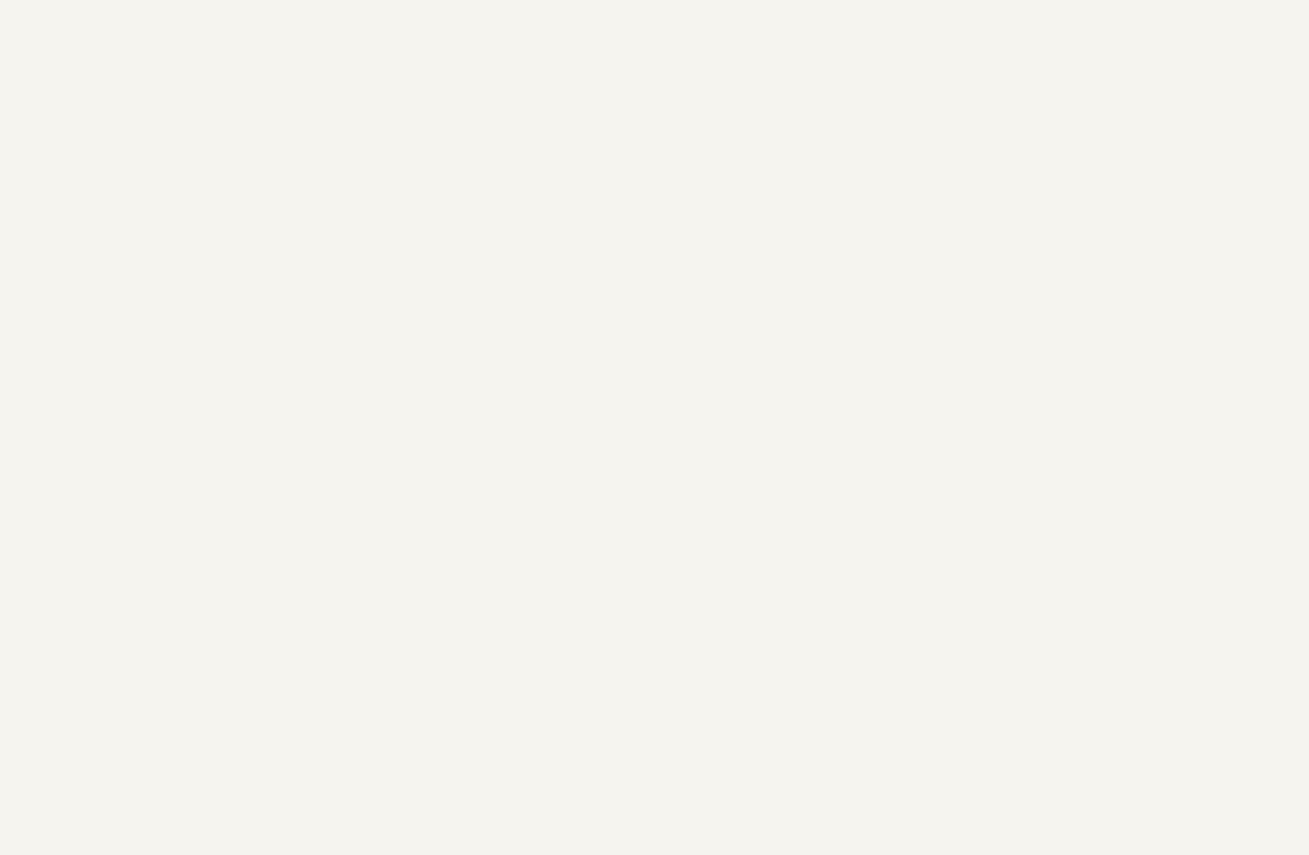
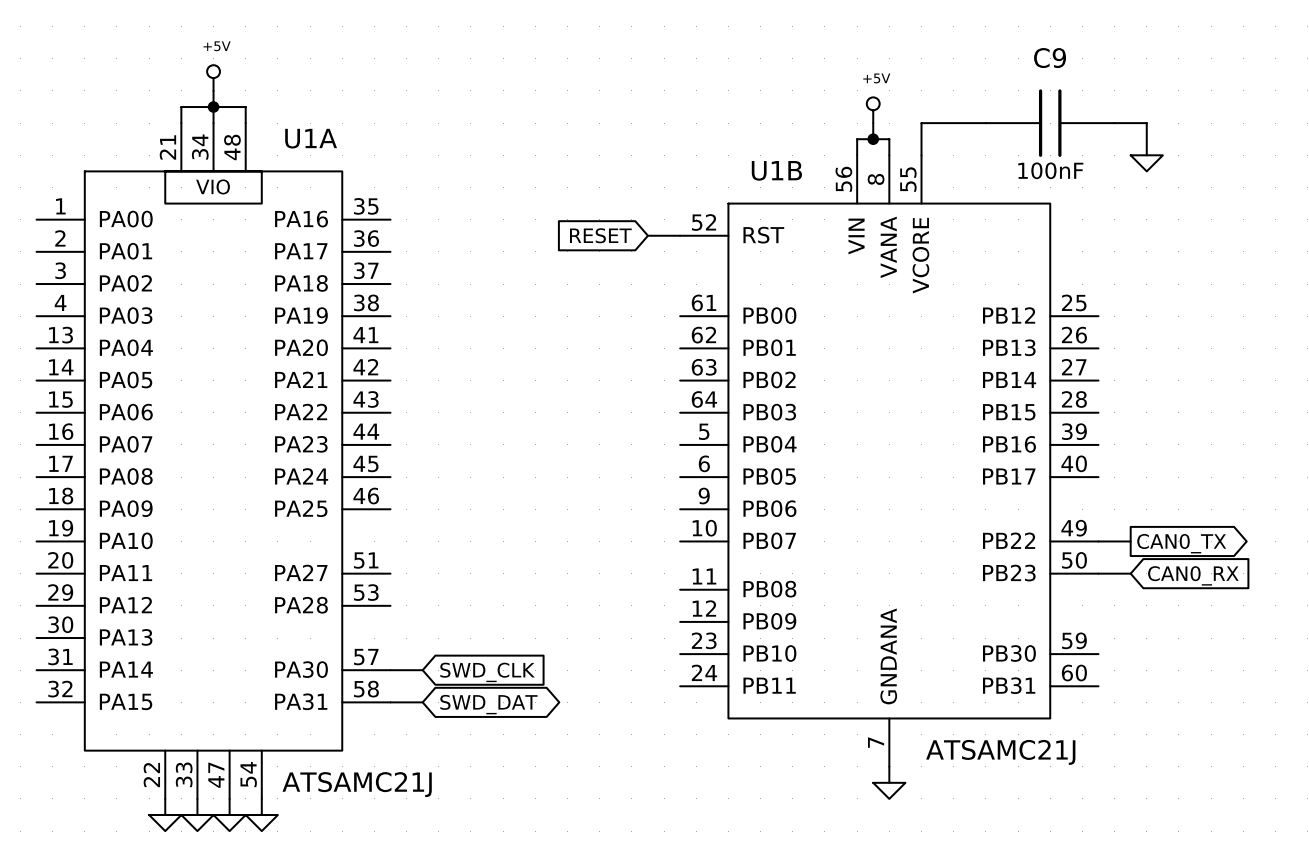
power symbol: none -> +5V (213, 78)
wire: none -> (213, 90) (213, 123)
junction: none -> (213, 107)
power symbol: none -> +5V (873, 110)
wire: none -> (181, 123) (181, 107) (245, 107) (245, 123)
wire: none -> (873, 123) (873, 139)
wire: none -> (985, 123) (921, 123) (921, 155)
C9: none -> 100nF (1050, 123)
wire: none -> (1114, 123) (1146, 123) (1146, 155)
junction: none -> (873, 139)
wire: none -> (857, 155) (857, 139) (889, 139) (889, 155)
power symbol: none -> (1146, 163)
global label: none -> RESET (600, 235)
wire: none -> (647, 235) (680, 235)
U1A: none -> ATSAMC21J (213, 461)
U1B: none -> ATSAMC21J (889, 461)
wire: none -> (1098, 541) (1130, 541)
global label: none -> CAN0_TX (1181, 543)
wire: none -> (1098, 573) (1130, 573)
global label: none -> CAN0_RX (1193, 575)
wire: none -> (390, 670) (422, 670)
global label: none -> SWD_CLK (487, 672)
wire: none -> (390, 702) (422, 702)
global label: none -> SWD_DAT (488, 704)
wire: none -> (889, 766) (889, 782)
power symbol: none -> (889, 790)
wire: none -> (165, 798) (165, 815)
wire: none -> (197, 798) (197, 815)
wire: none -> (229, 798) (229, 815)
wire: none -> (261, 798) (261, 815)
power symbol: none -> (165, 823)
power symbol: none -> (197, 823)
power symbol: none -> (229, 823)
power symbol: none -> (261, 823)

